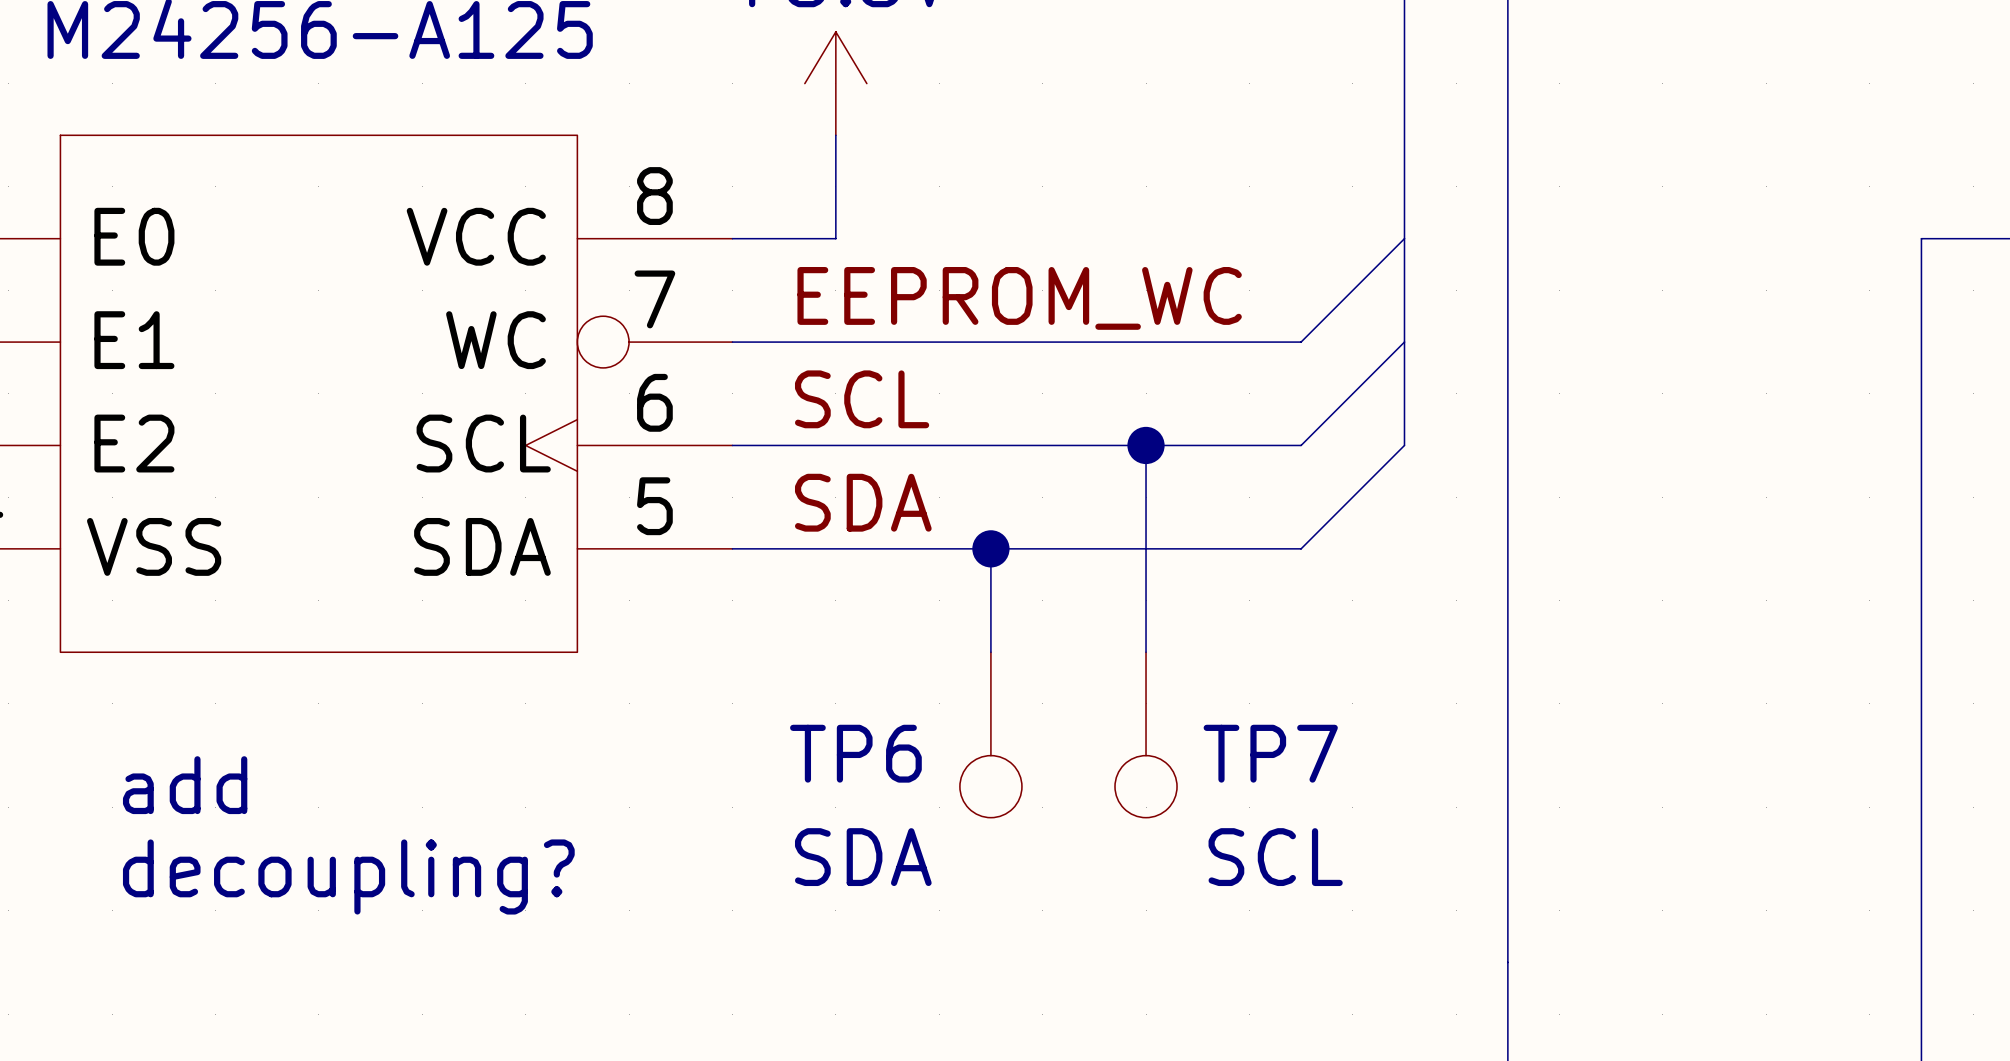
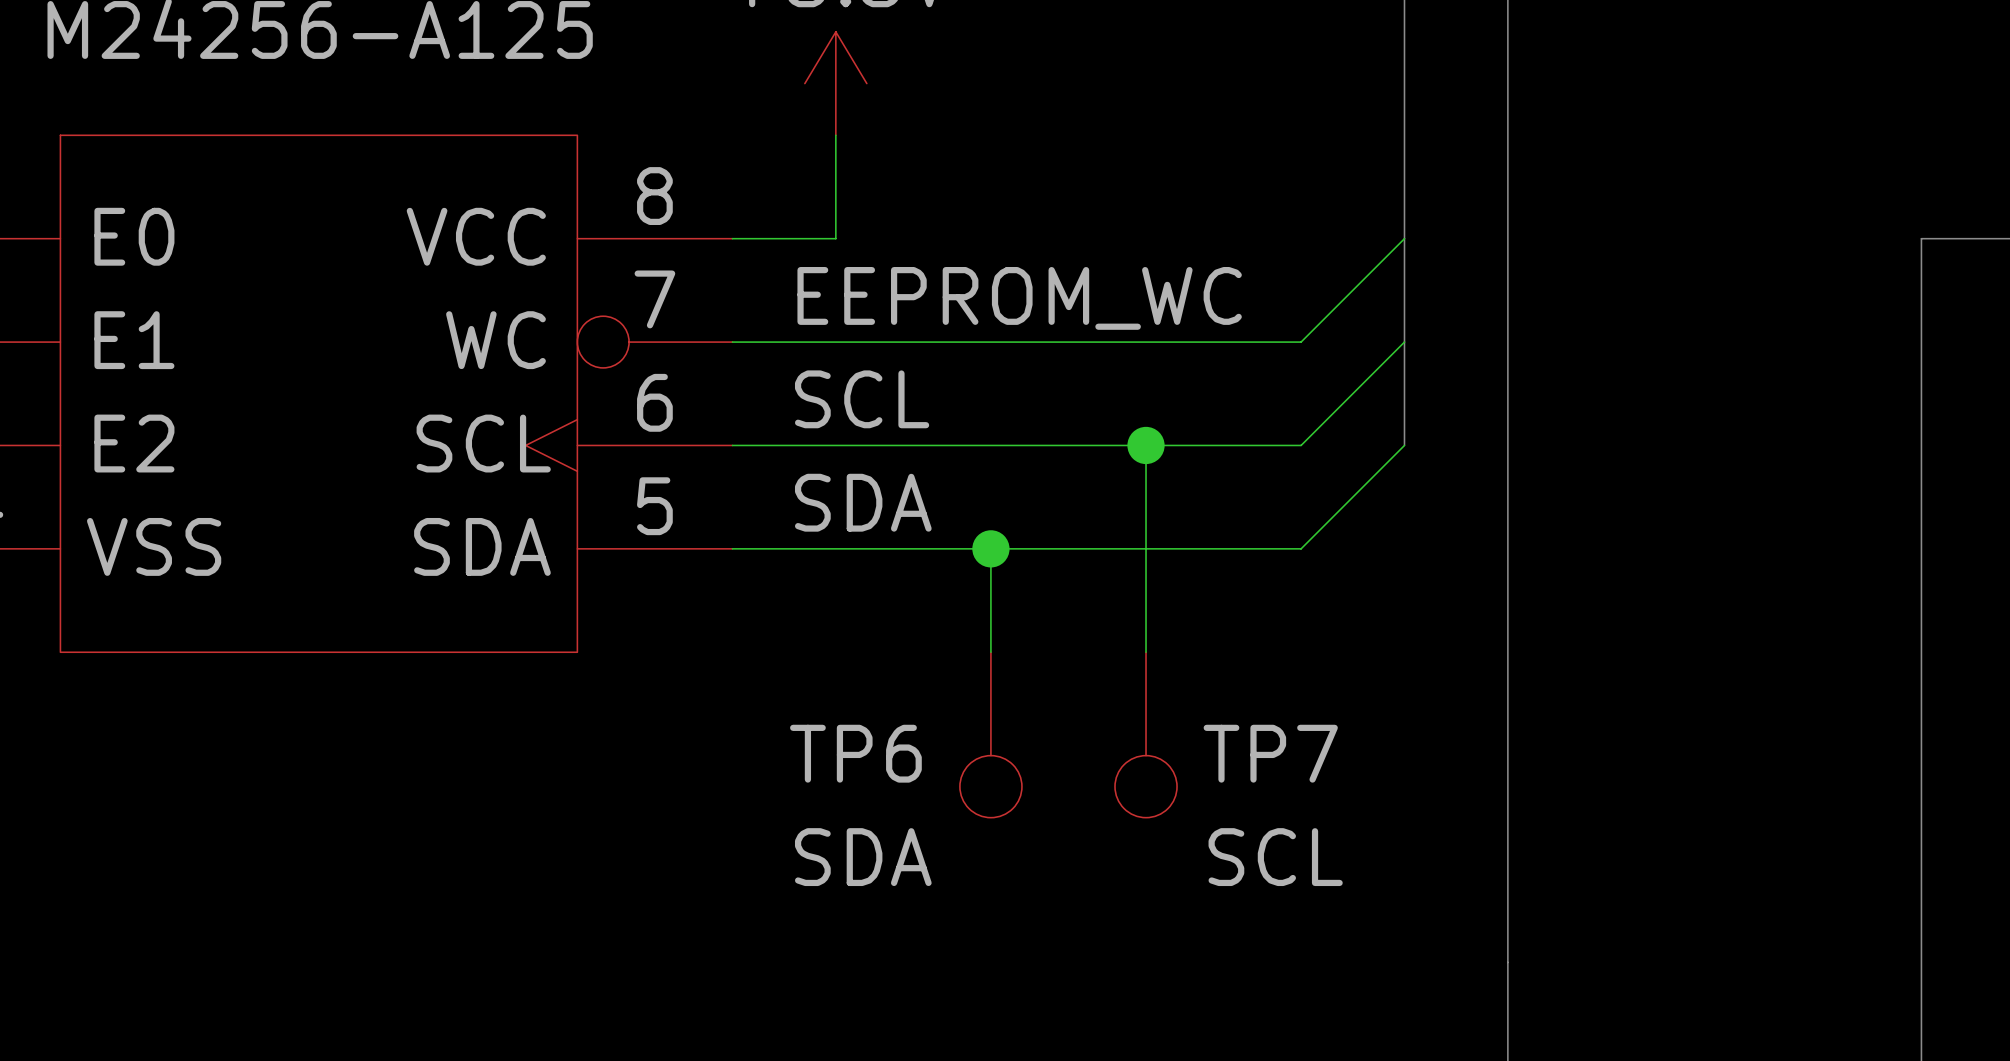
text: add (185, 785) -> none
text: decoupling? (348, 876) -> none

